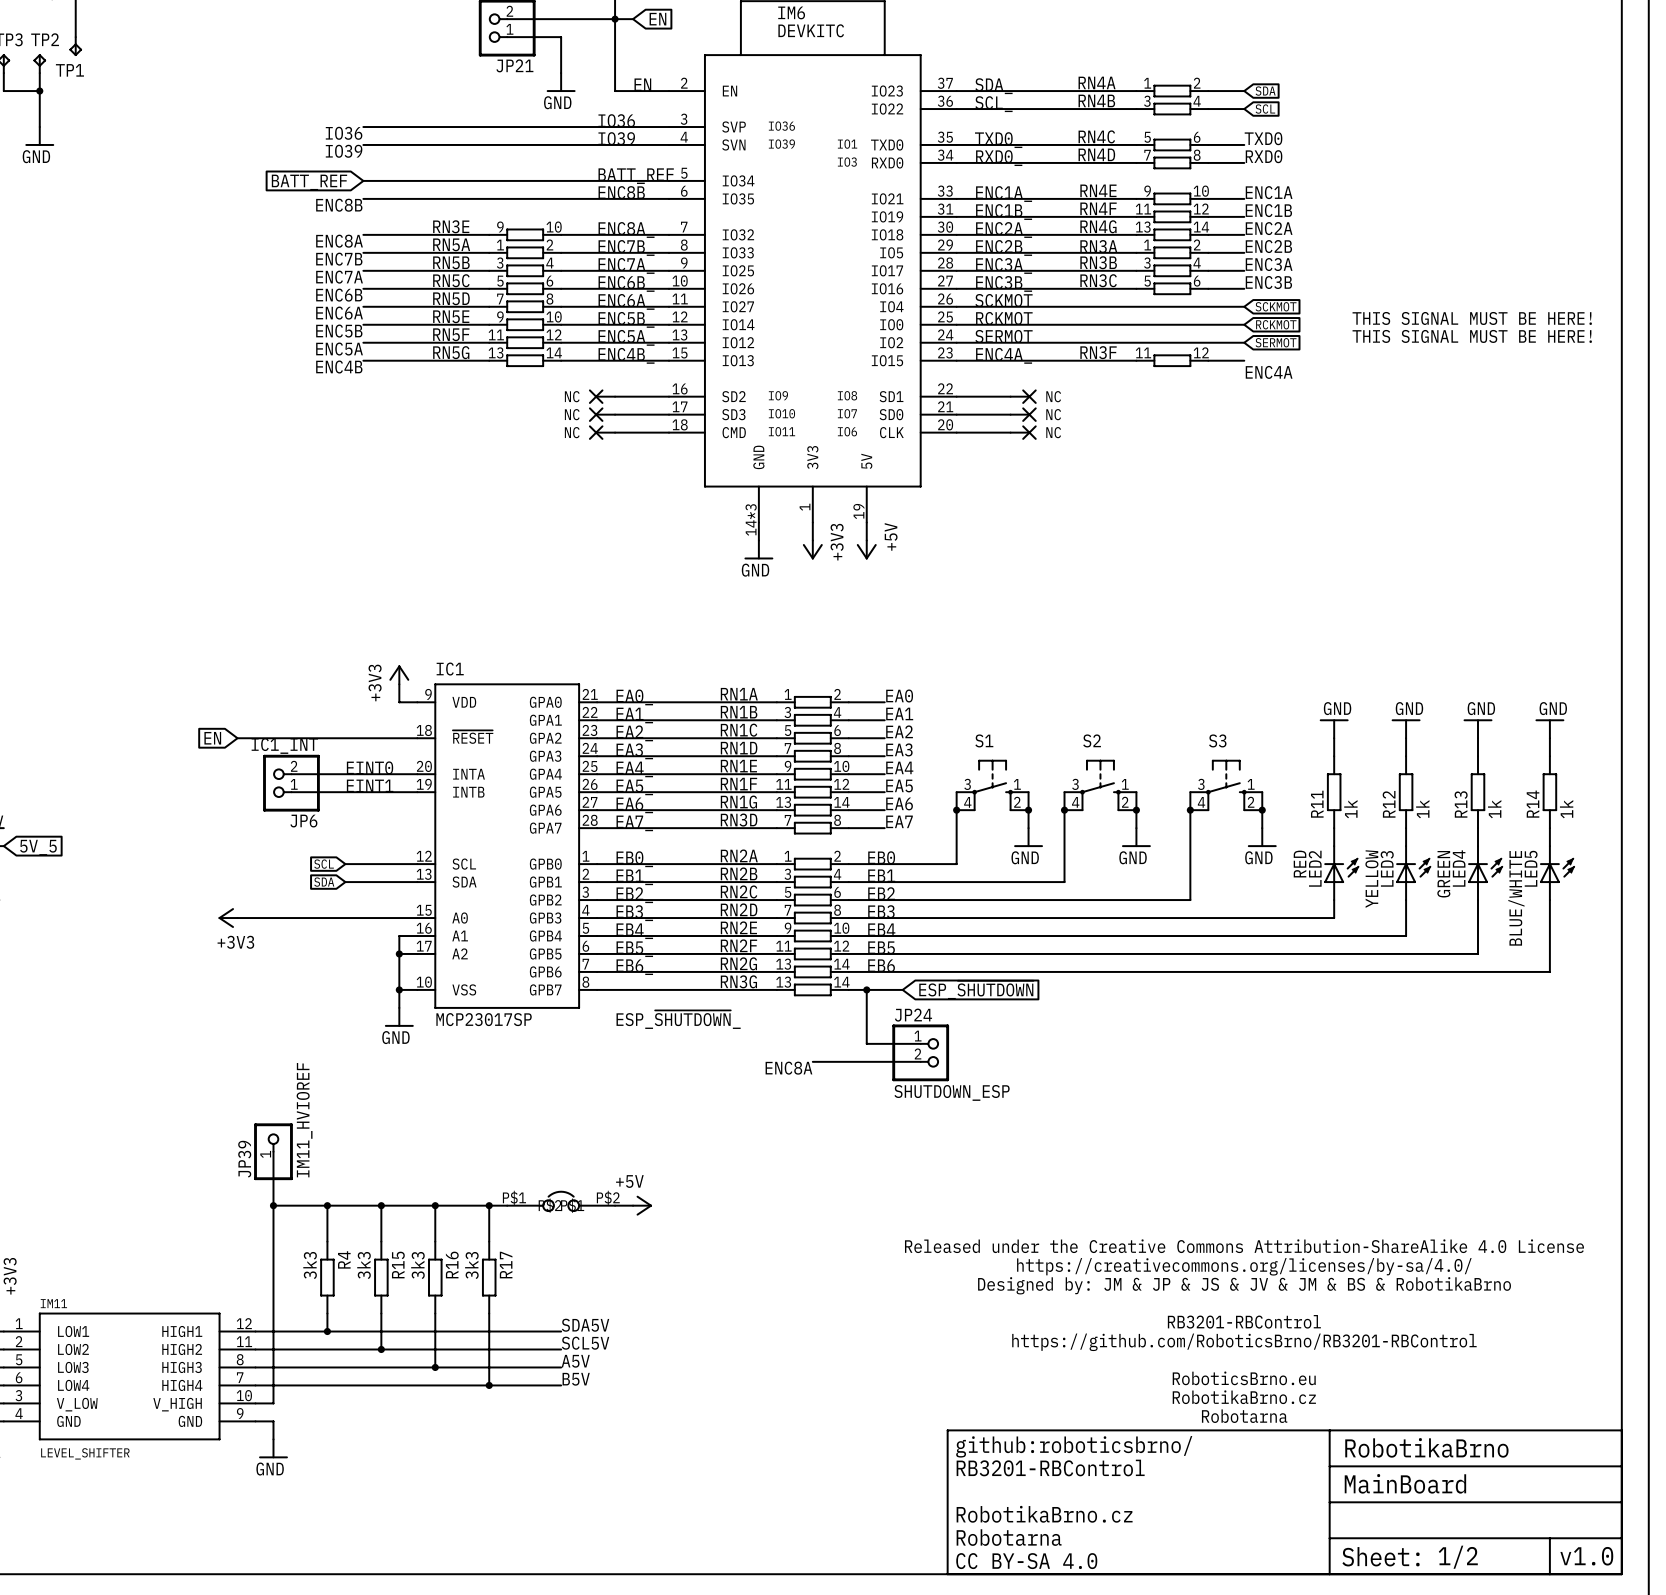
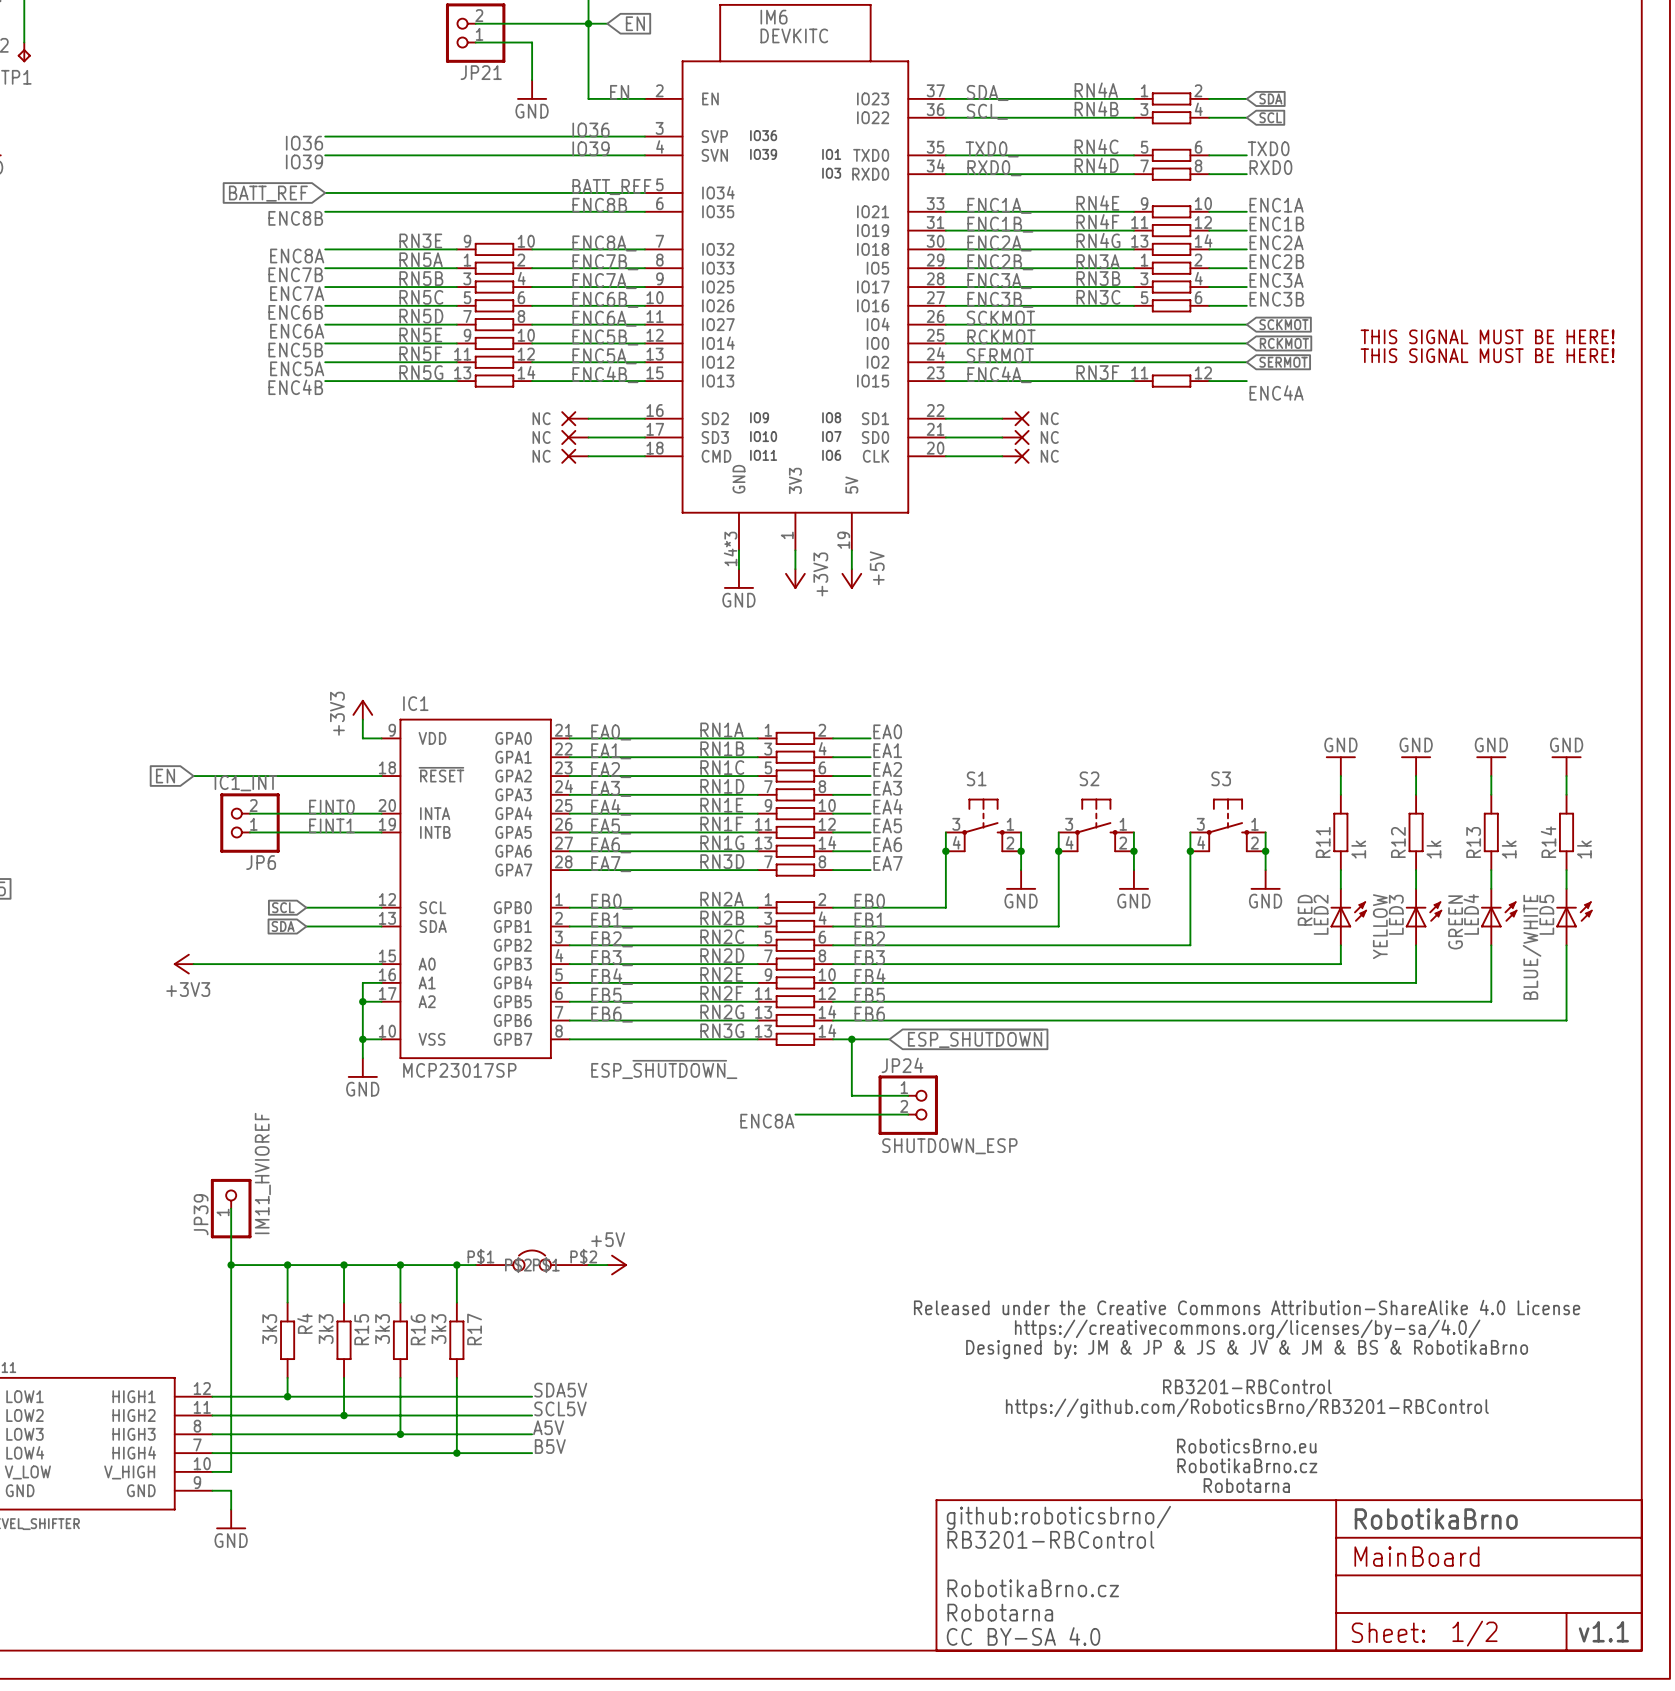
text: v1.0 (1586, 1556) -> v1.1 (1603, 1631)

